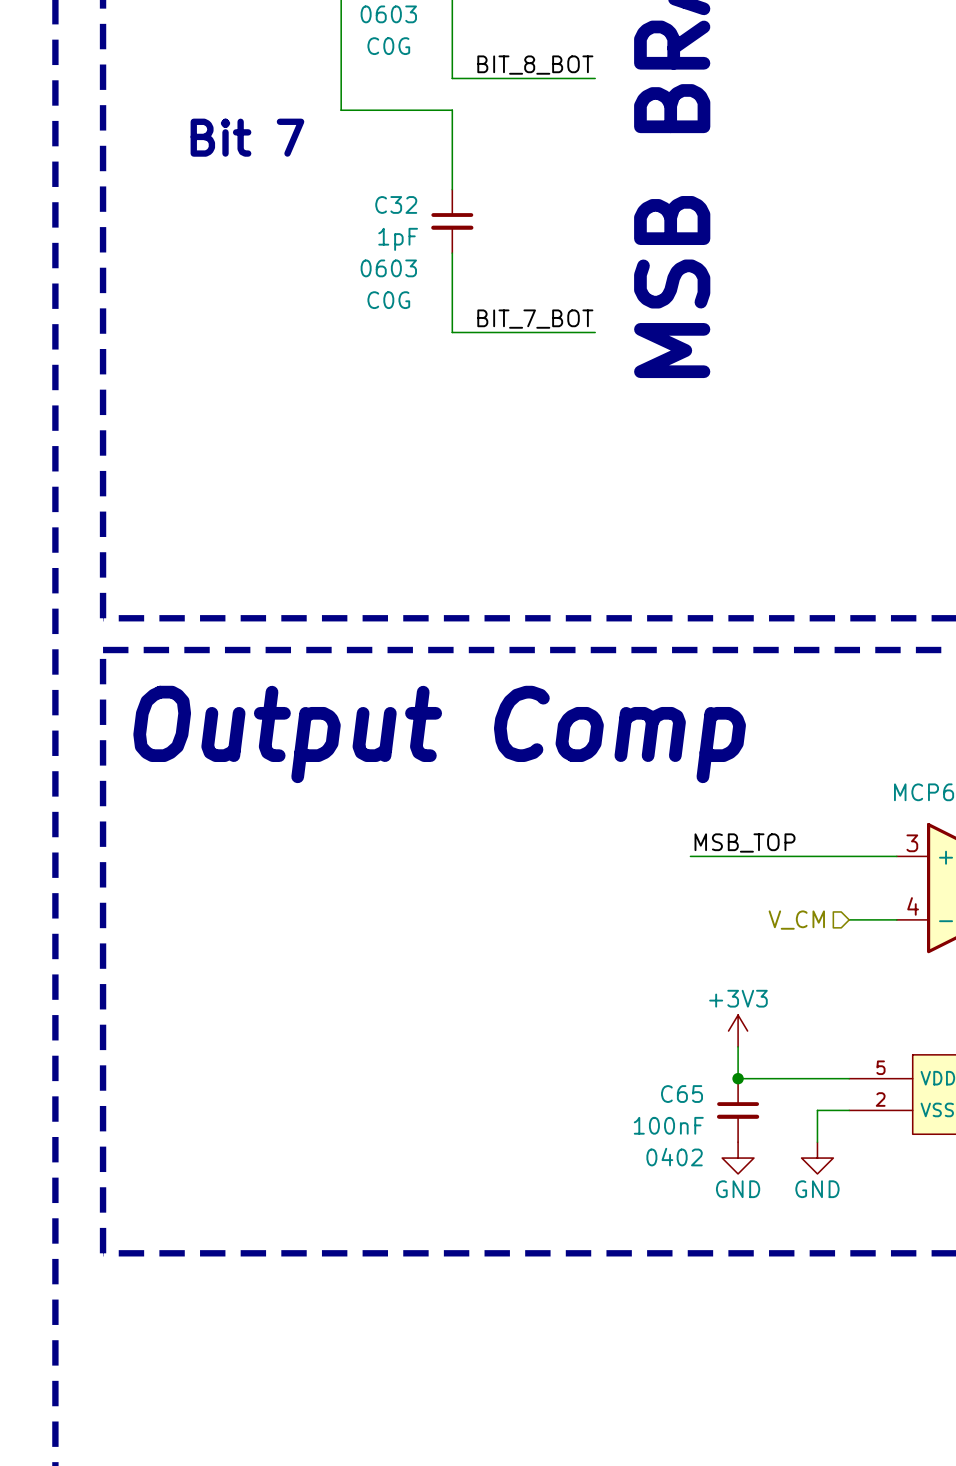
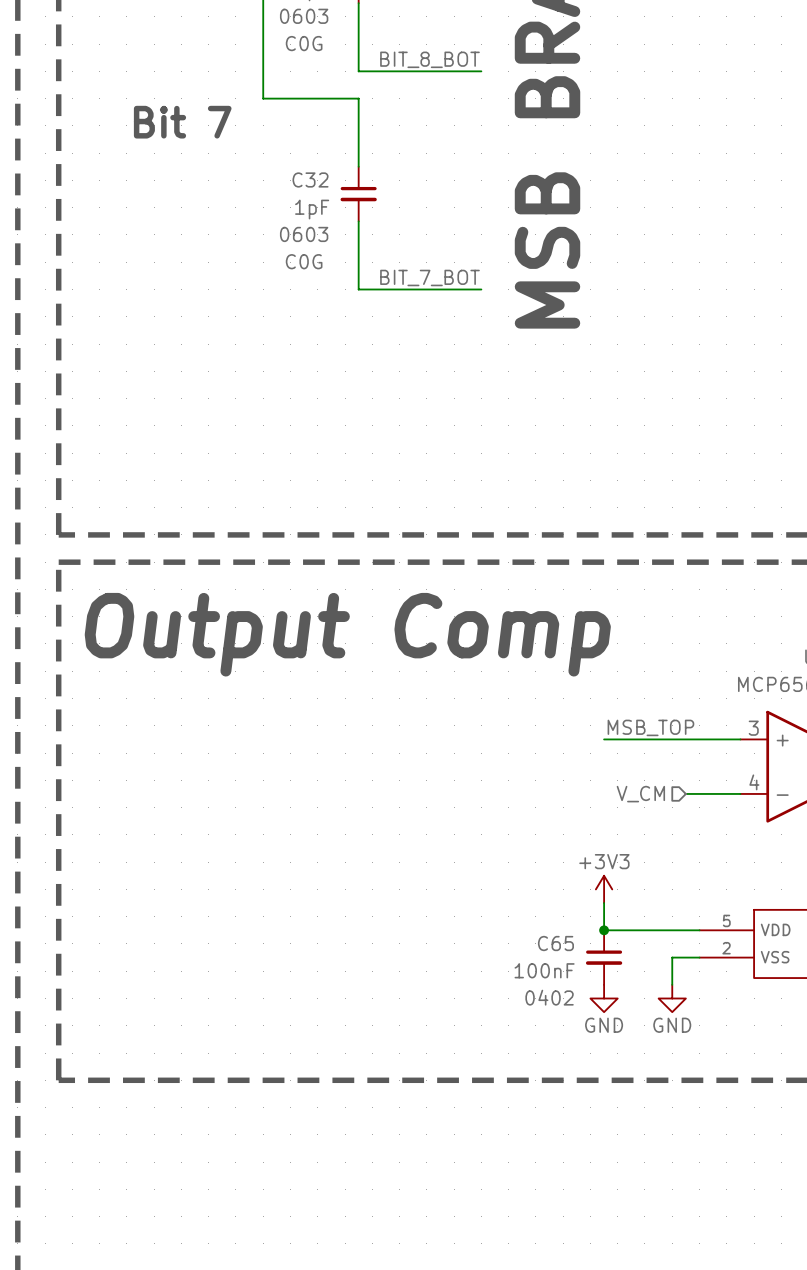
label position: MSB_TOP (745, 842) -> MSB_TOP (650, 727)
wire: (690, 856) (738, 856) -> none
wire: none -> (685, 793) (699, 793)
hierarchical label position: V_CM (796, 920) -> V_CM (640, 794)

